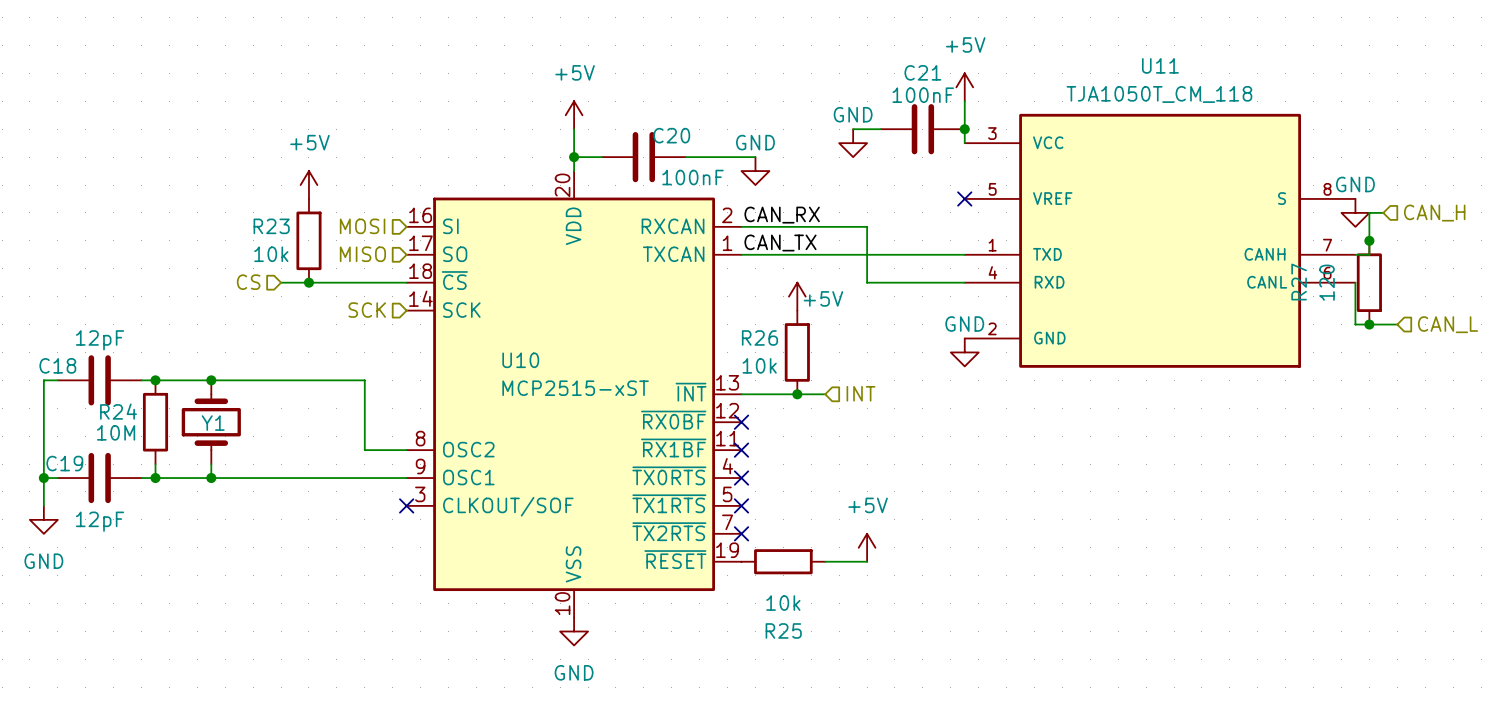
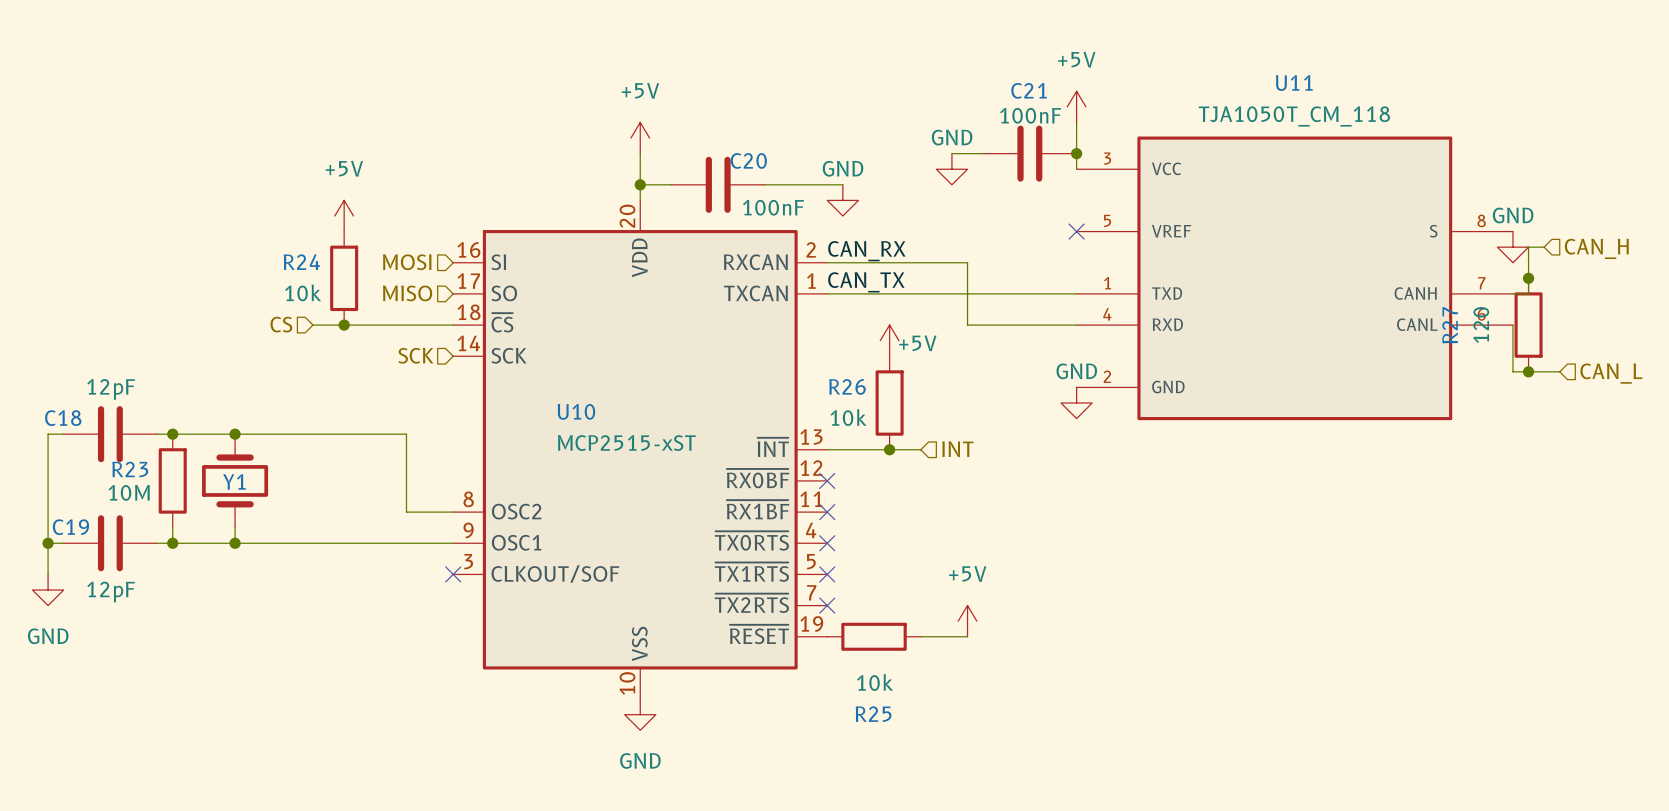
R23 name: R23 (271, 226) -> R24 (301, 262)
R24 name: R24 (118, 411) -> R23 (130, 469)

